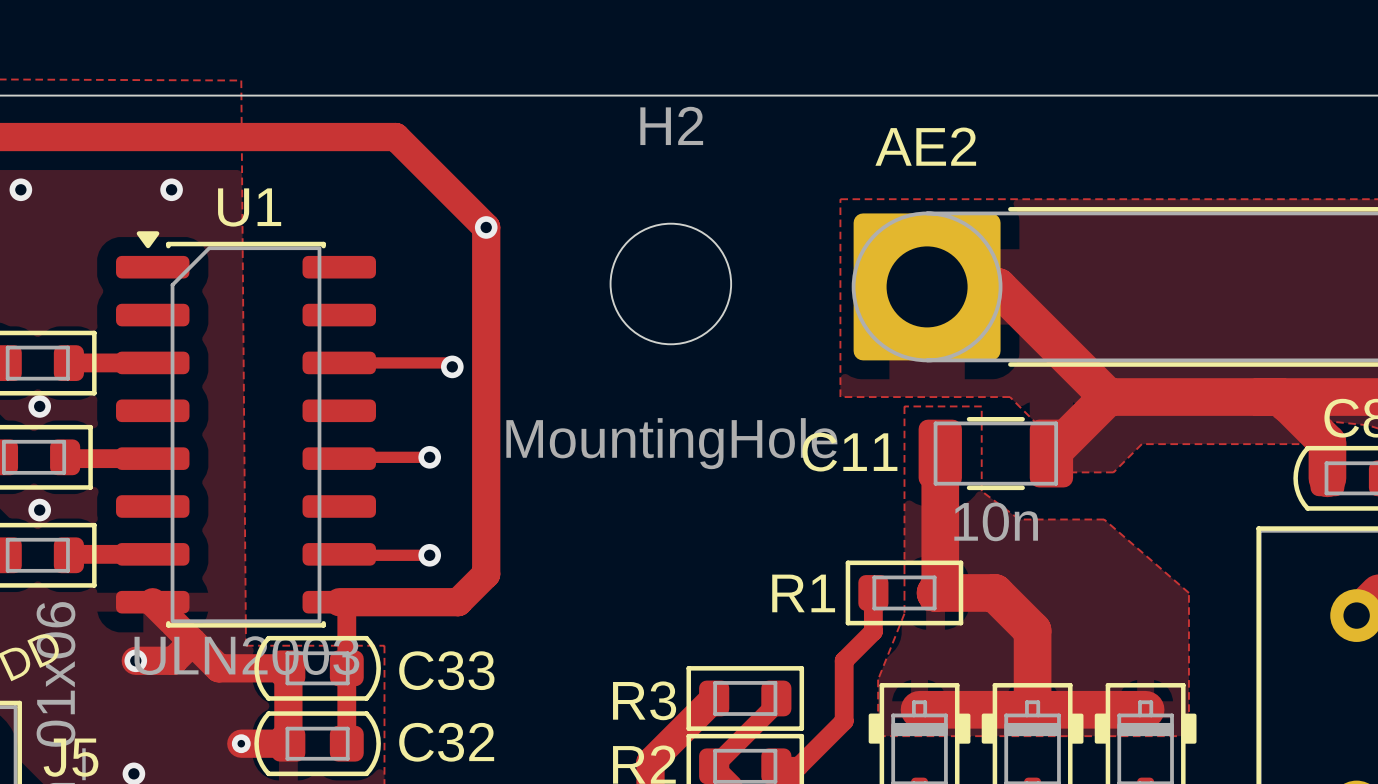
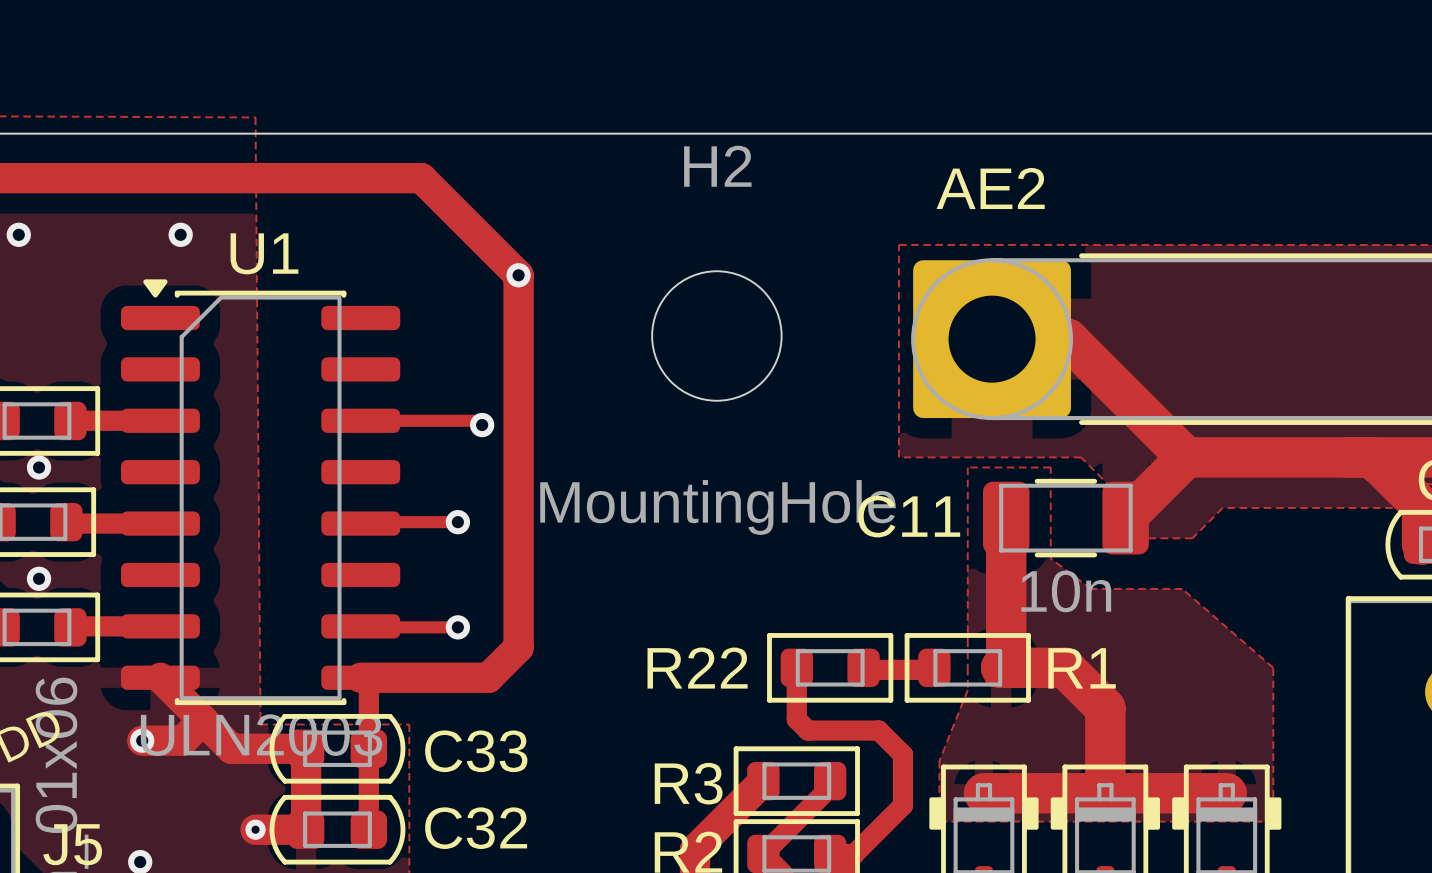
track: none -> (796, 667) (796, 719) (807, 730) (878, 730) (903, 754)
R22: none -> (830, 667)
track: (873, 592) (873, 631) (844, 660) (844, 673) -> (934, 667) (932, 669) (878, 669)
R1 name position: R1 (803, 593) -> R1 (1082, 668)

